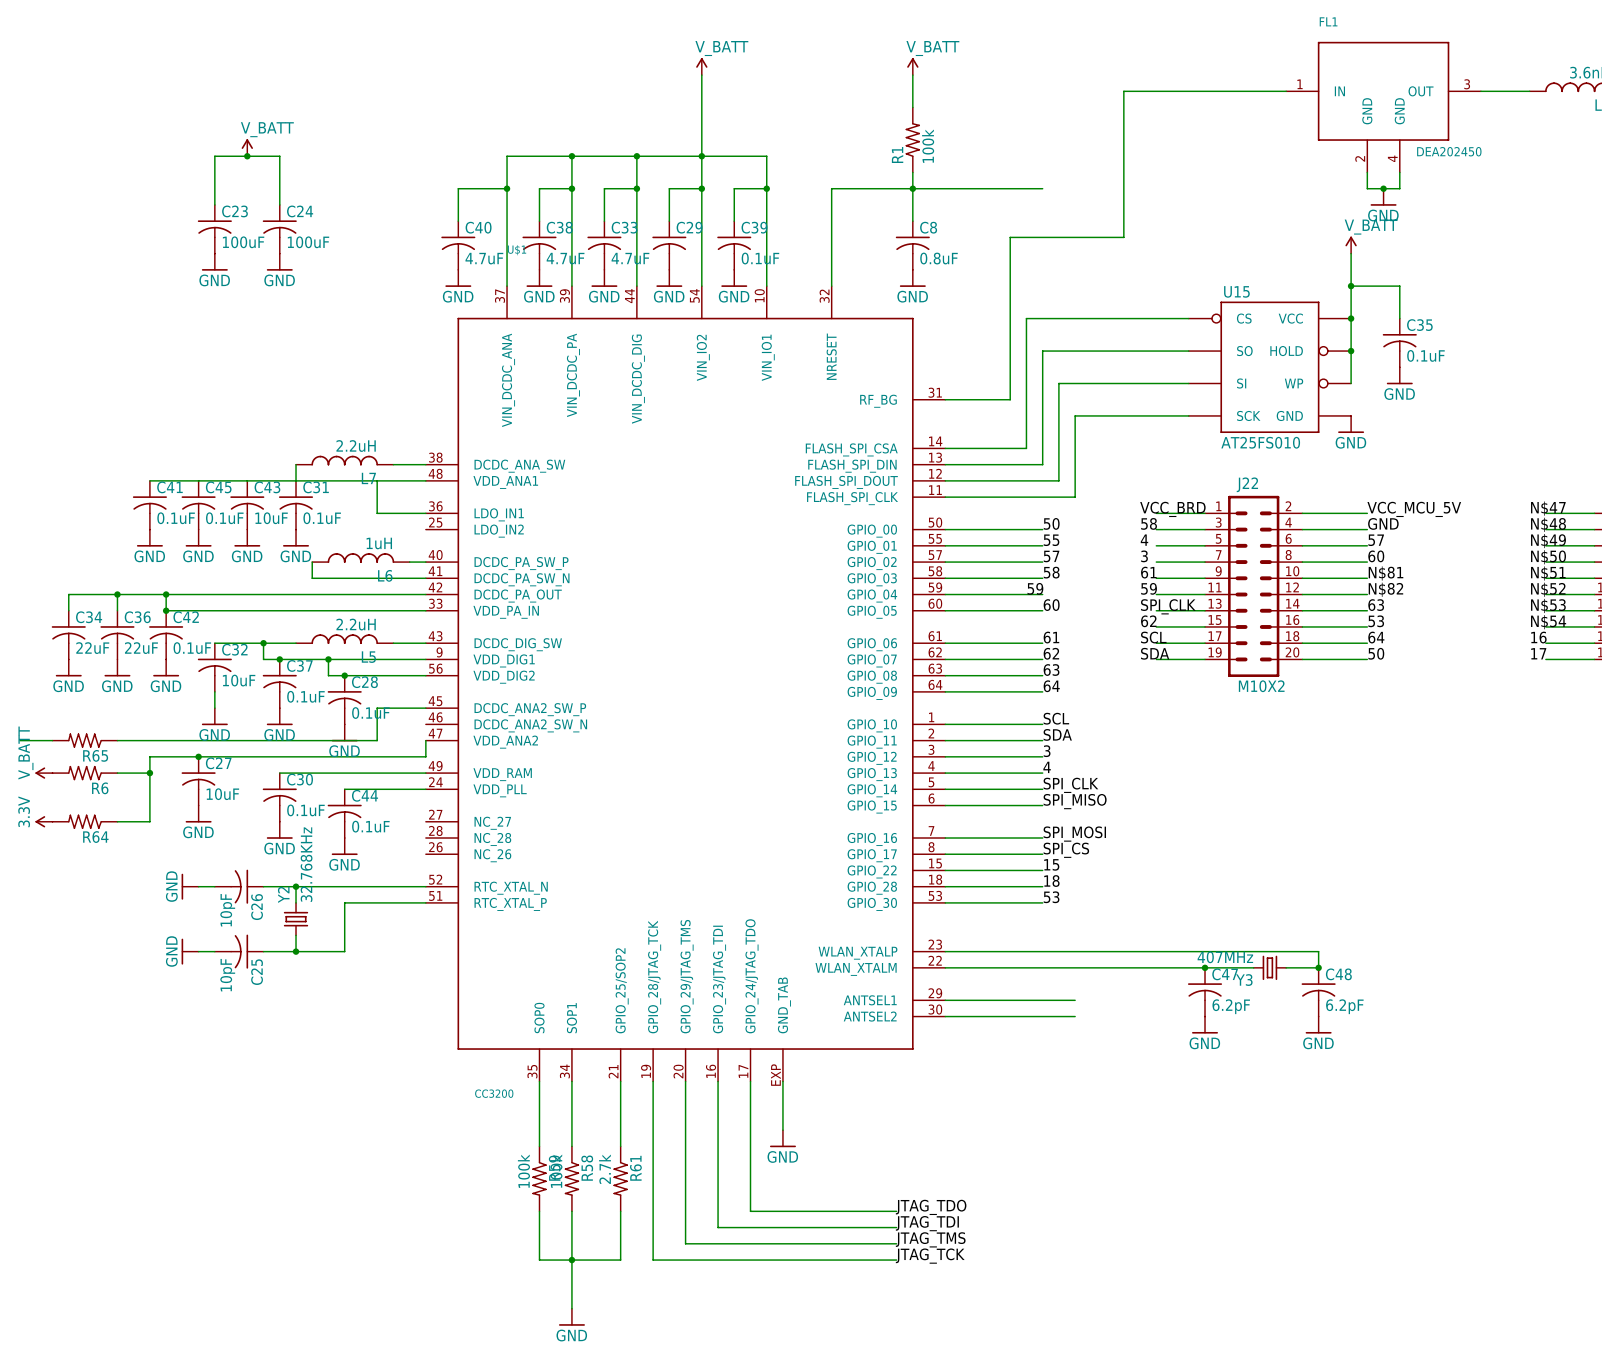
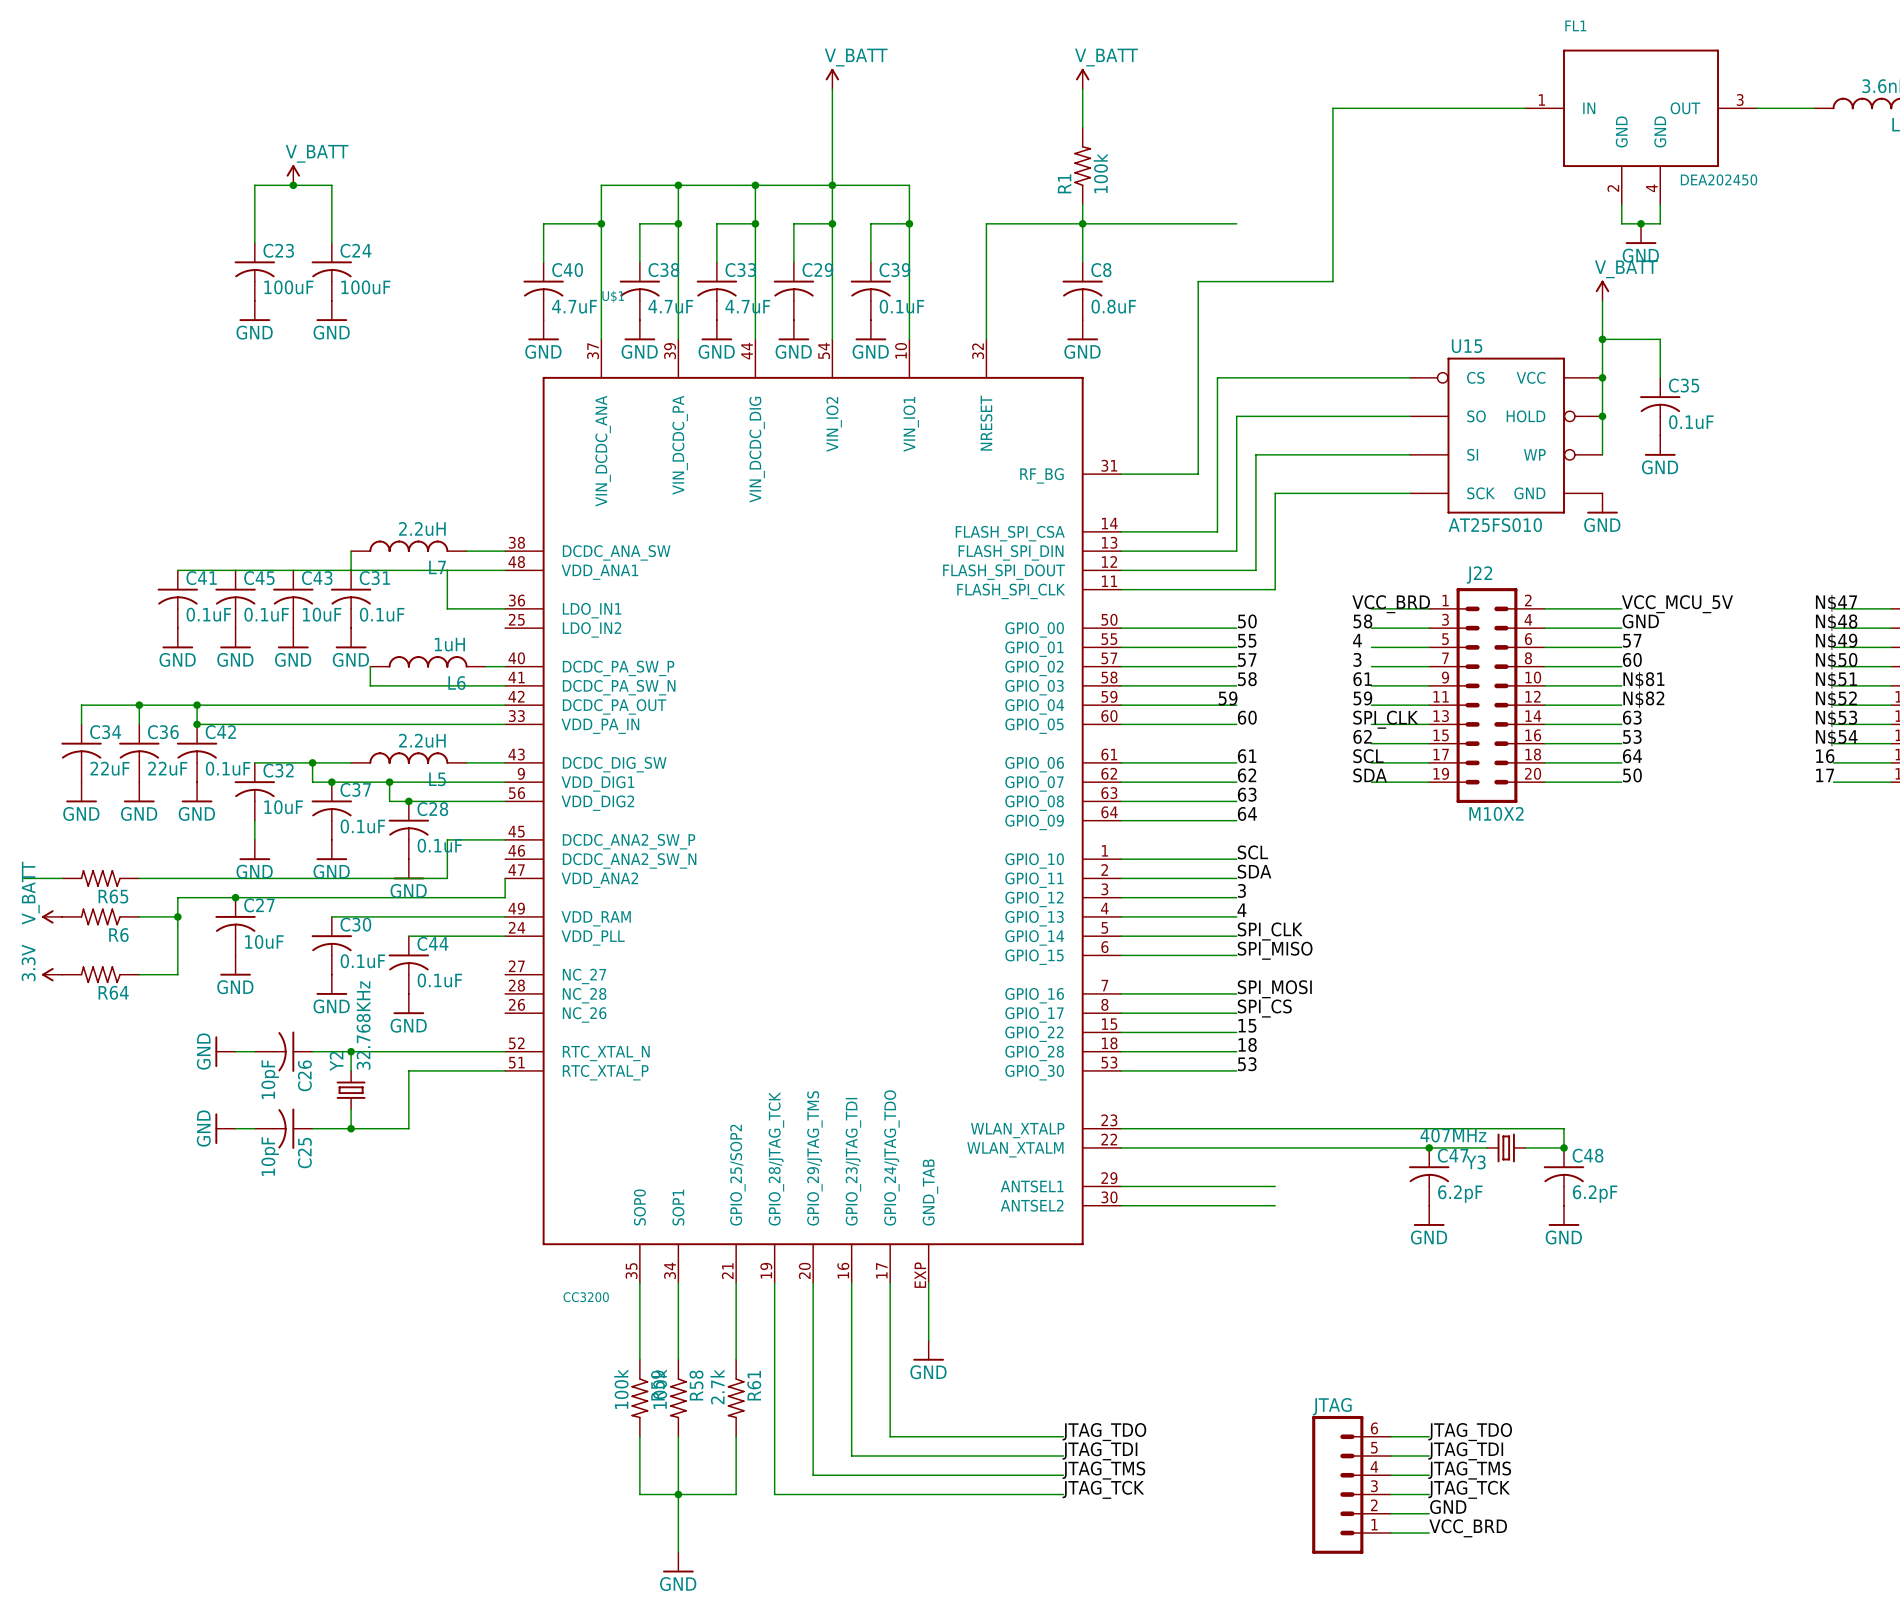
label: none -> JTAG_TDO (1470, 1432)
wire: none -> (1390, 1436) (1429, 1436)
label: none -> JTAG_TDI (1465, 1451)
wire: none -> (1390, 1456) (1429, 1456)
label: none -> JTAG_TMS (1469, 1470)
wire: none -> (1390, 1475) (1429, 1475)
JTAG: none -> (1351, 1484)
label: none -> JTAG_TCK (1469, 1489)
wire: none -> (1390, 1494) (1429, 1494)
label: none -> GND (1448, 1507)
wire: none -> (1390, 1513) (1429, 1513)
label: none -> VCC_BRD (1468, 1528)
wire: none -> (1390, 1533) (1429, 1533)

